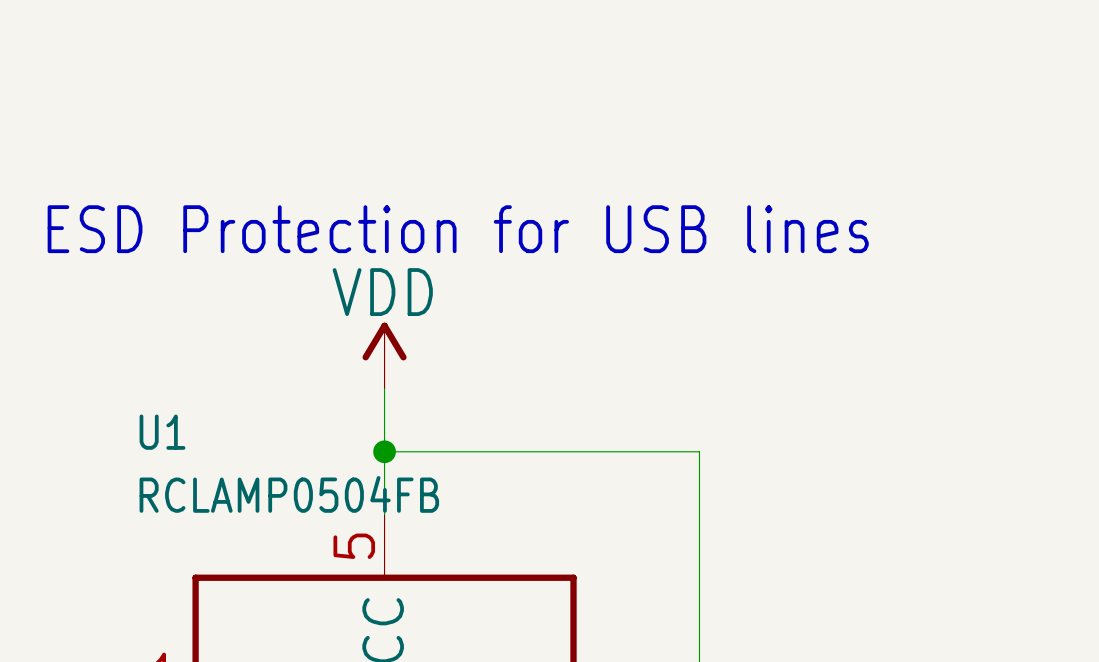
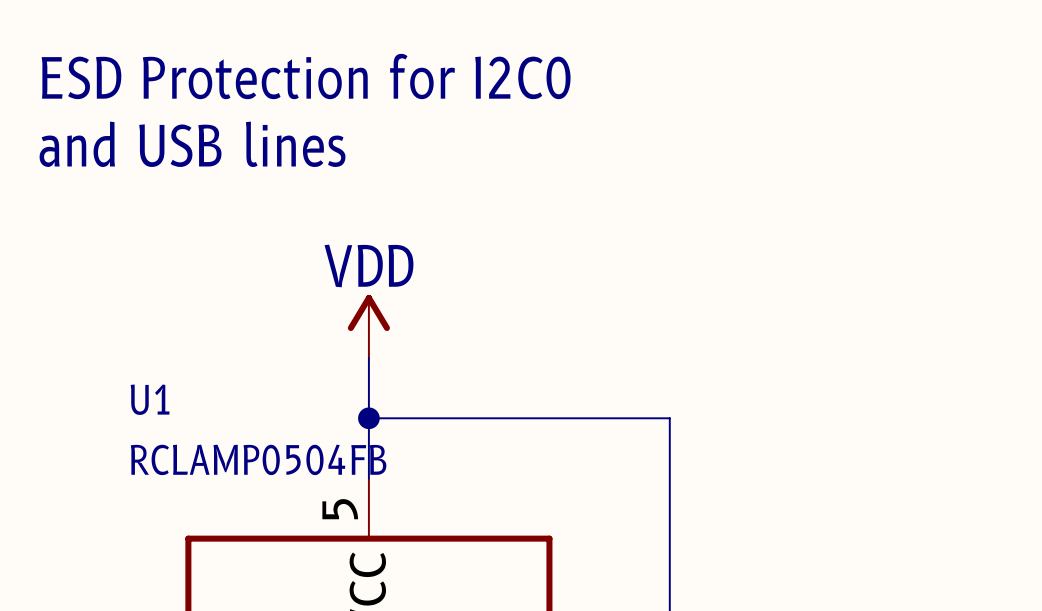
text: none -> ESD Protection for I2C0 (306, 76)
text: none -> and USB lines (192, 144)
text: ESD Protection for USB lines (458, 229) -> none

